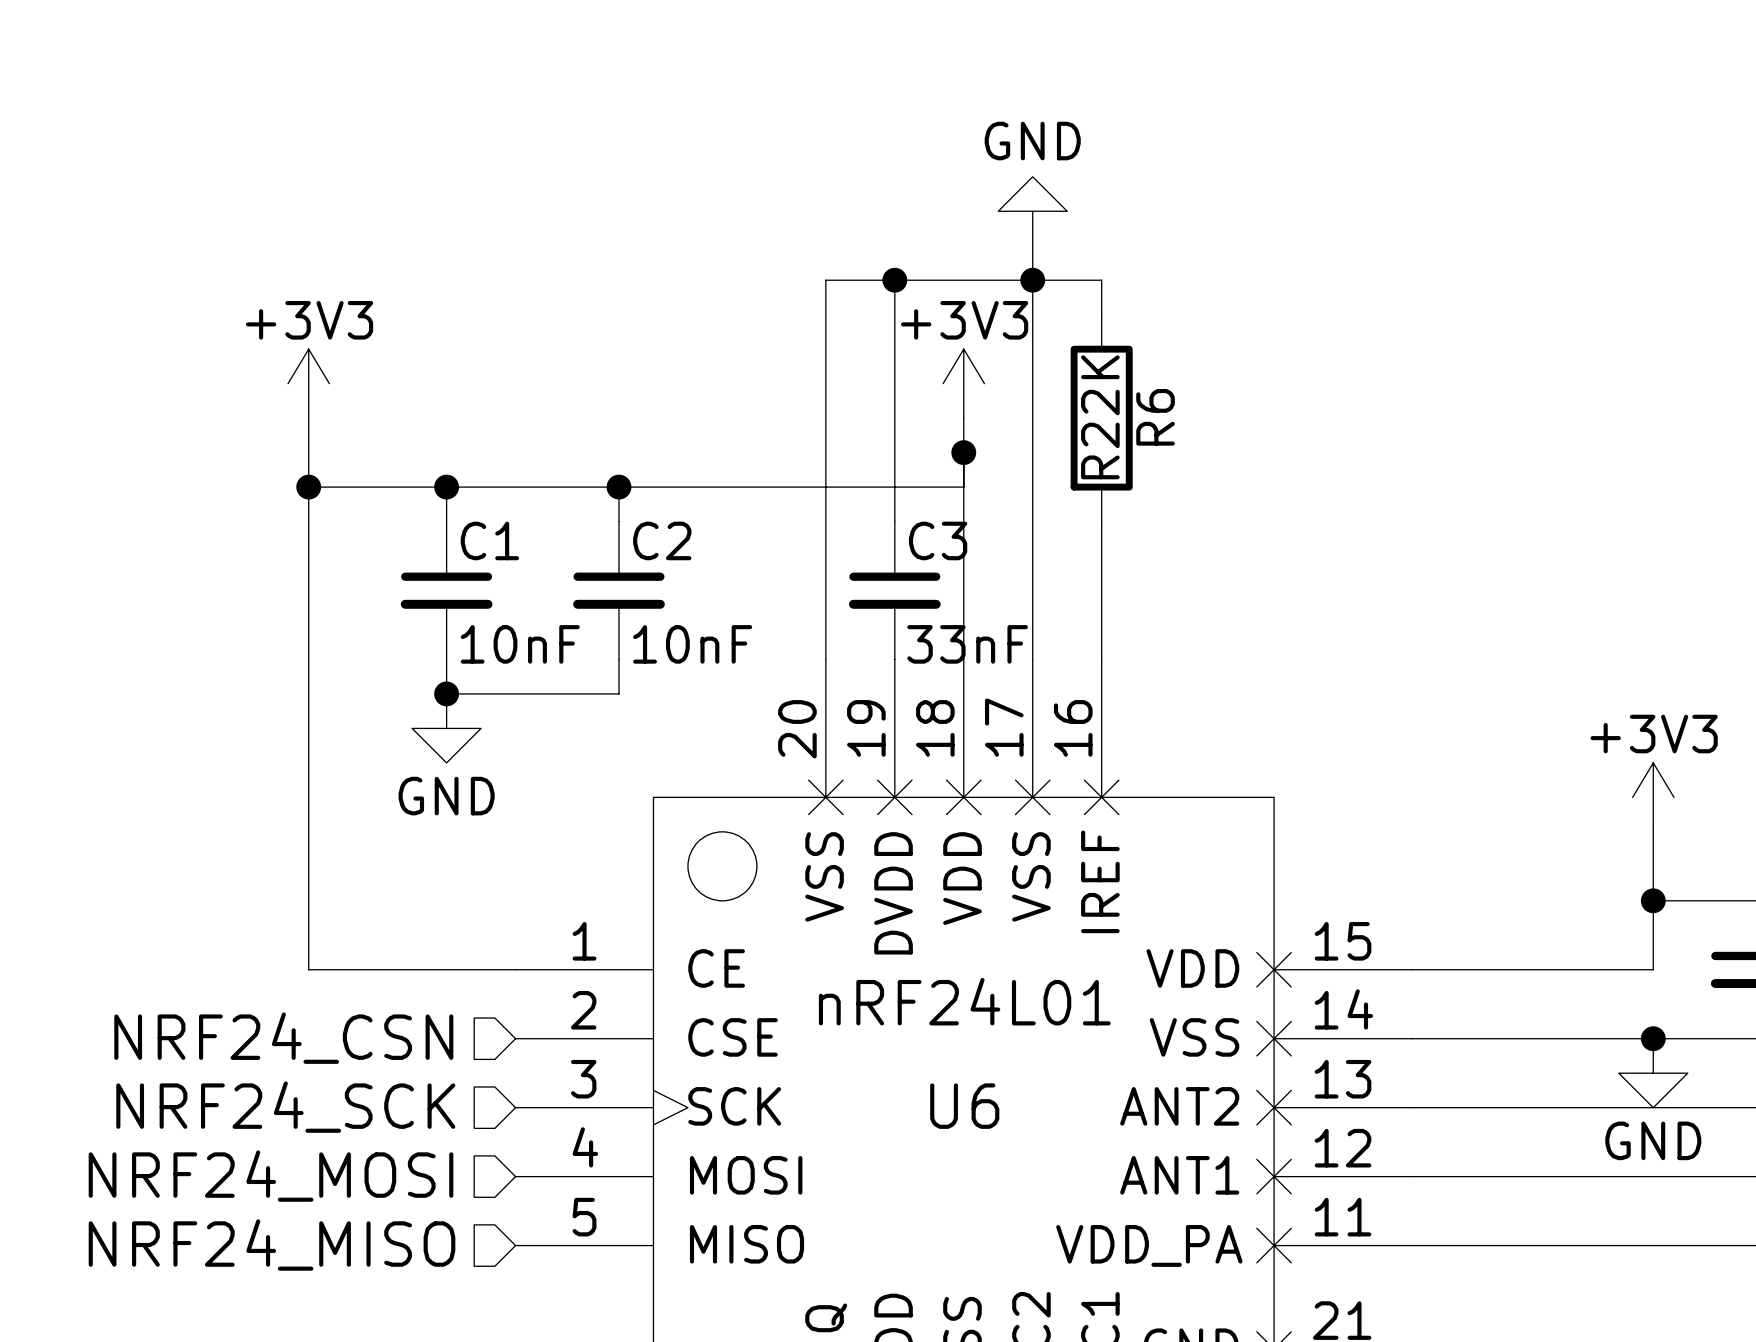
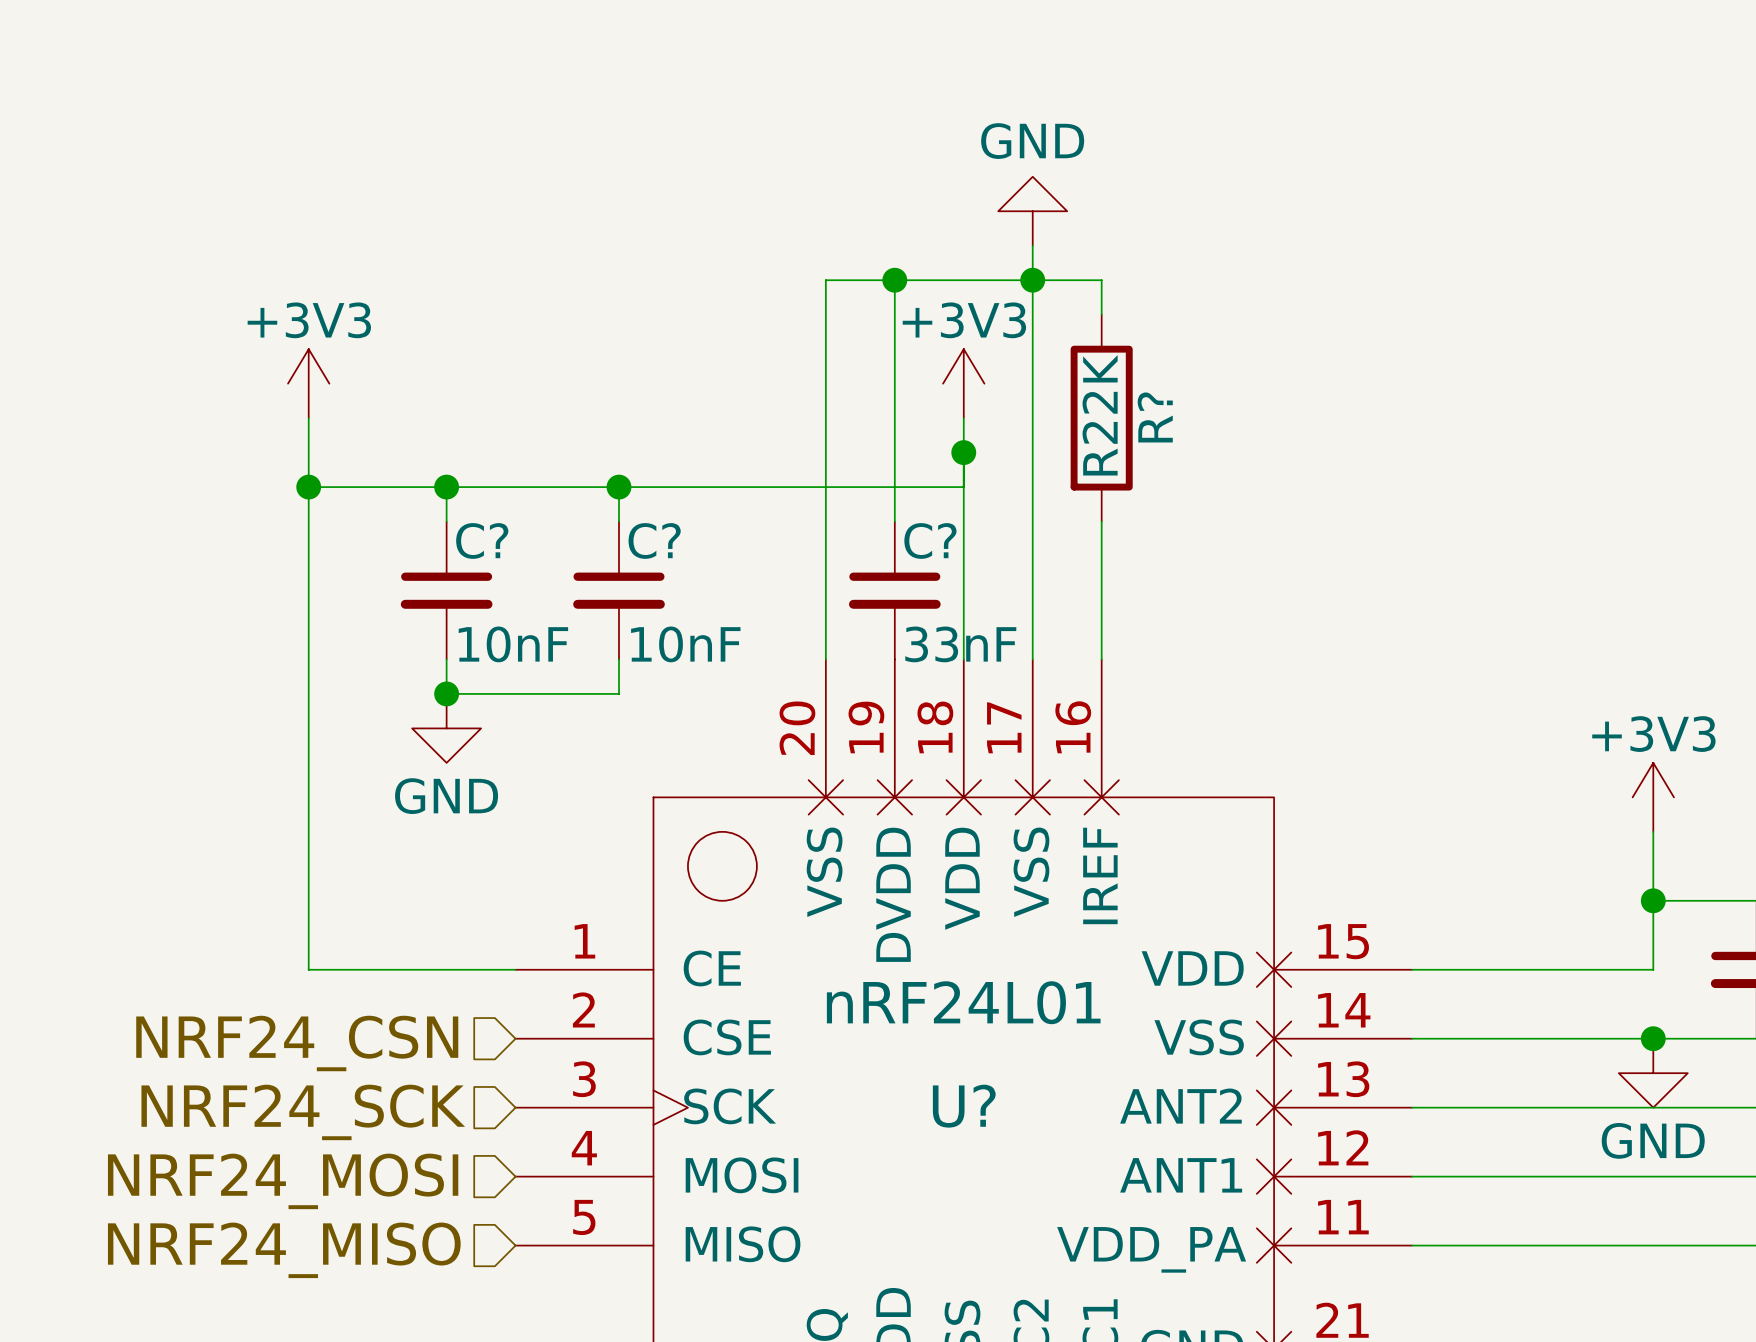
R6 name: R6 (1155, 417) -> R? (1155, 417)
C1 name: C1 (489, 540) -> C? (482, 540)
C2 name: C2 (662, 540) -> C? (654, 540)
C3 name: C3 (938, 540) -> C? (930, 540)
U6 name: U6 (964, 1106) -> U? (964, 1106)

